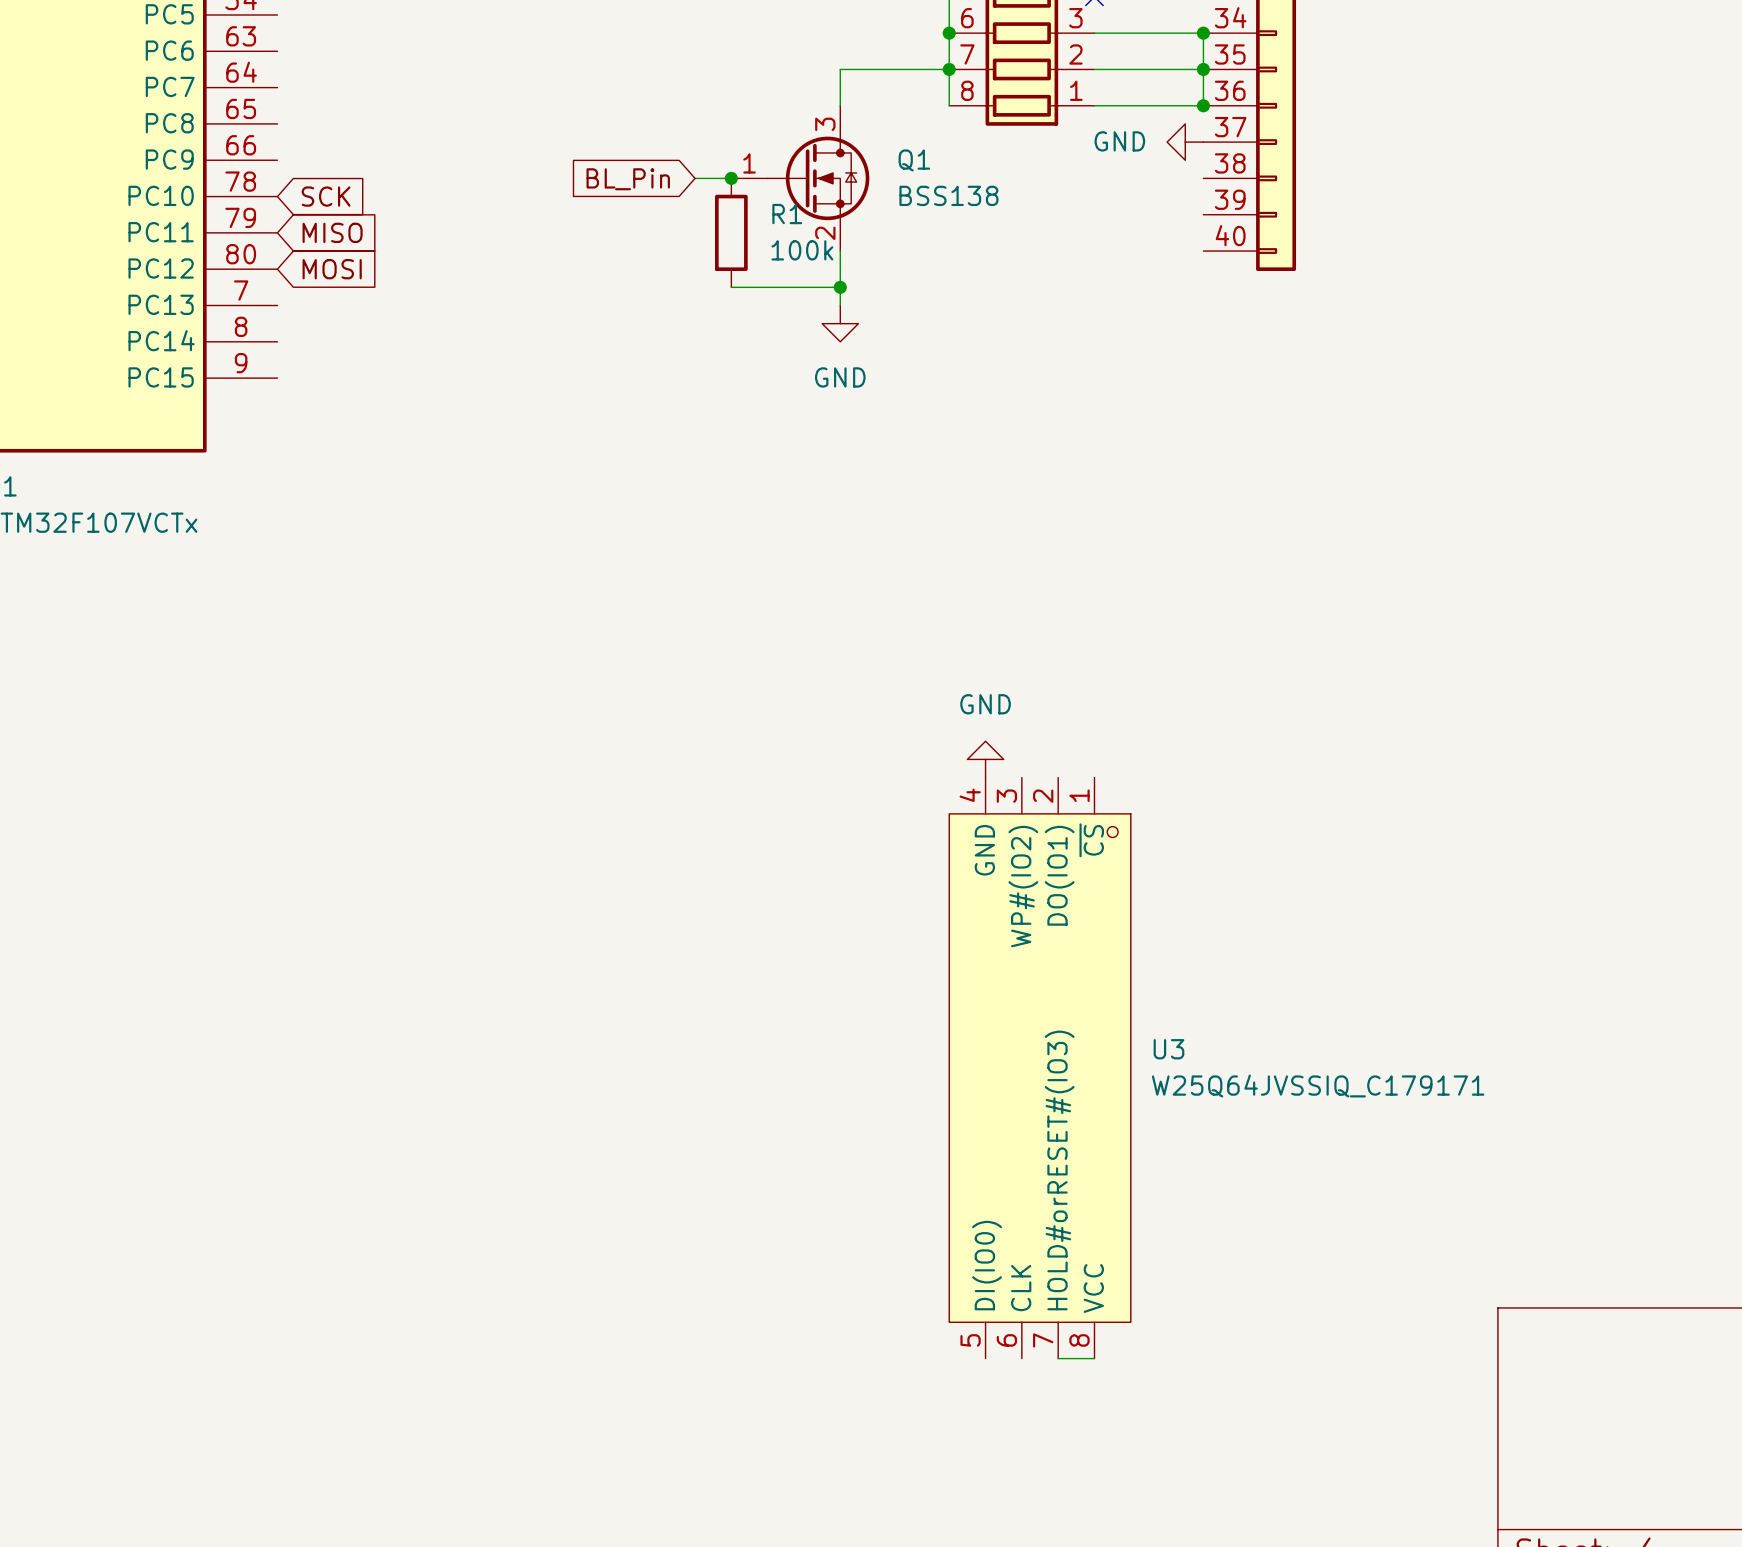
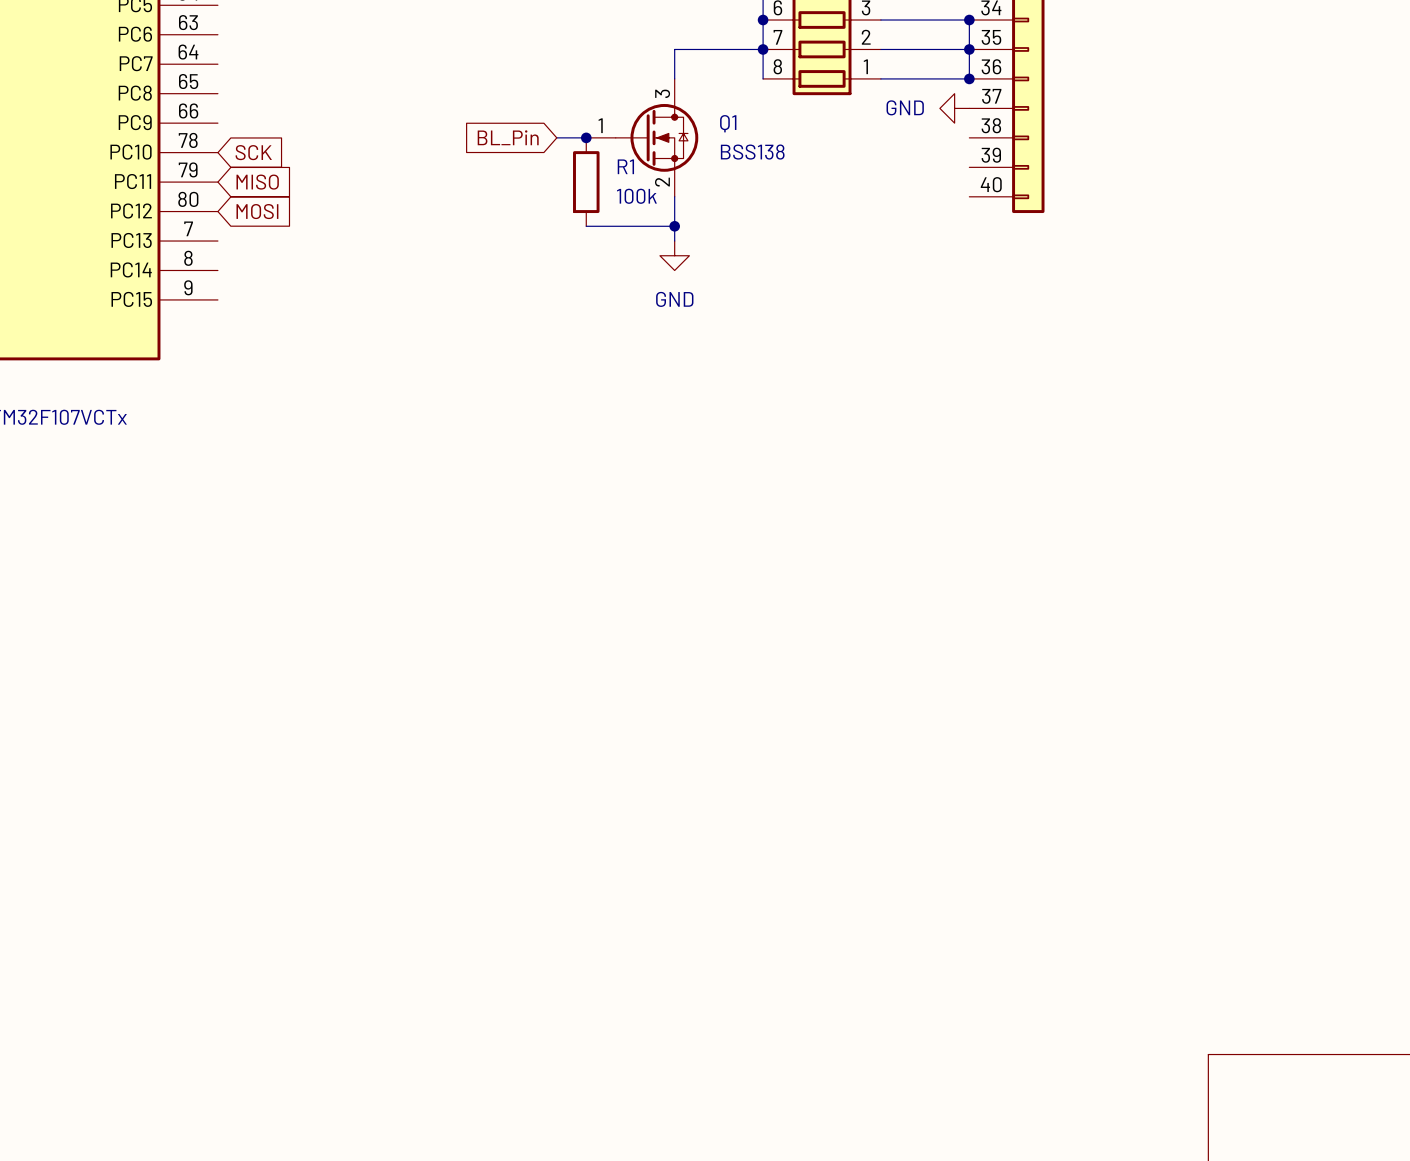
power symbol: GND (985, 759) -> none
U3: W25Q64JVSSIQ_C179171 (1040, 1068) -> none
wire: (1058, 1358) (1094, 1358) -> none

